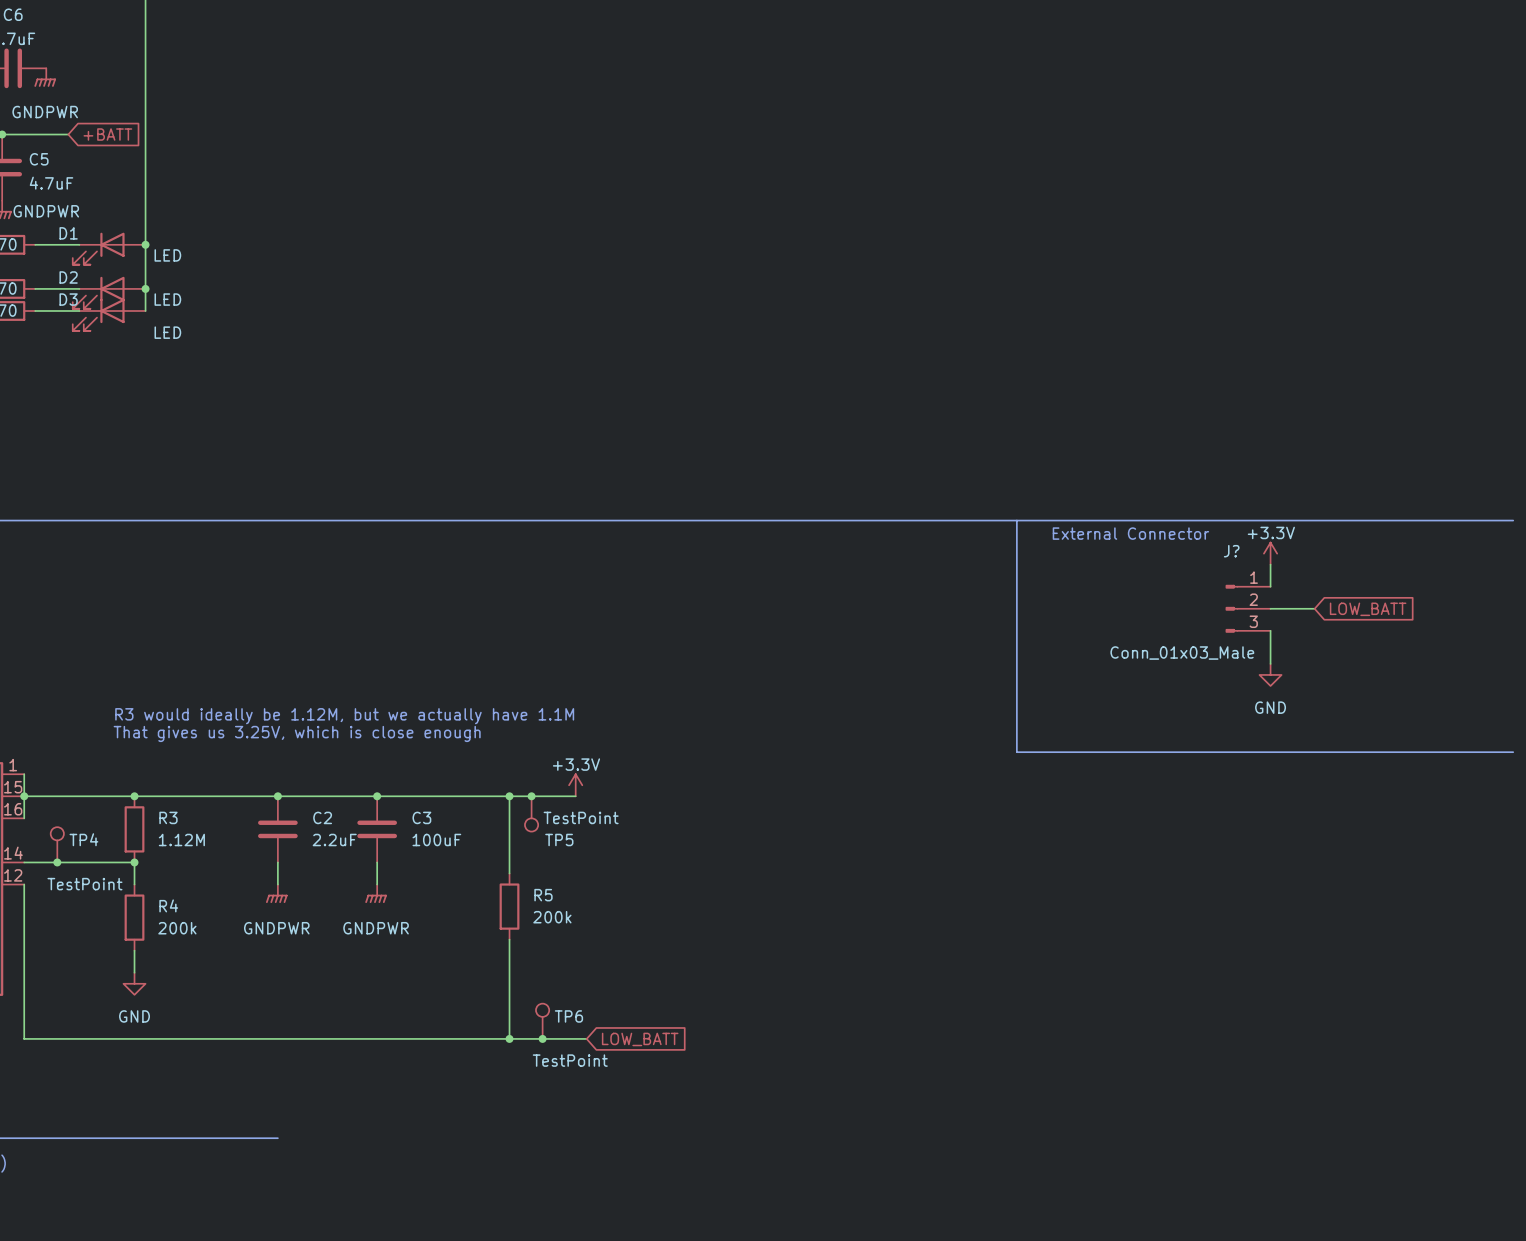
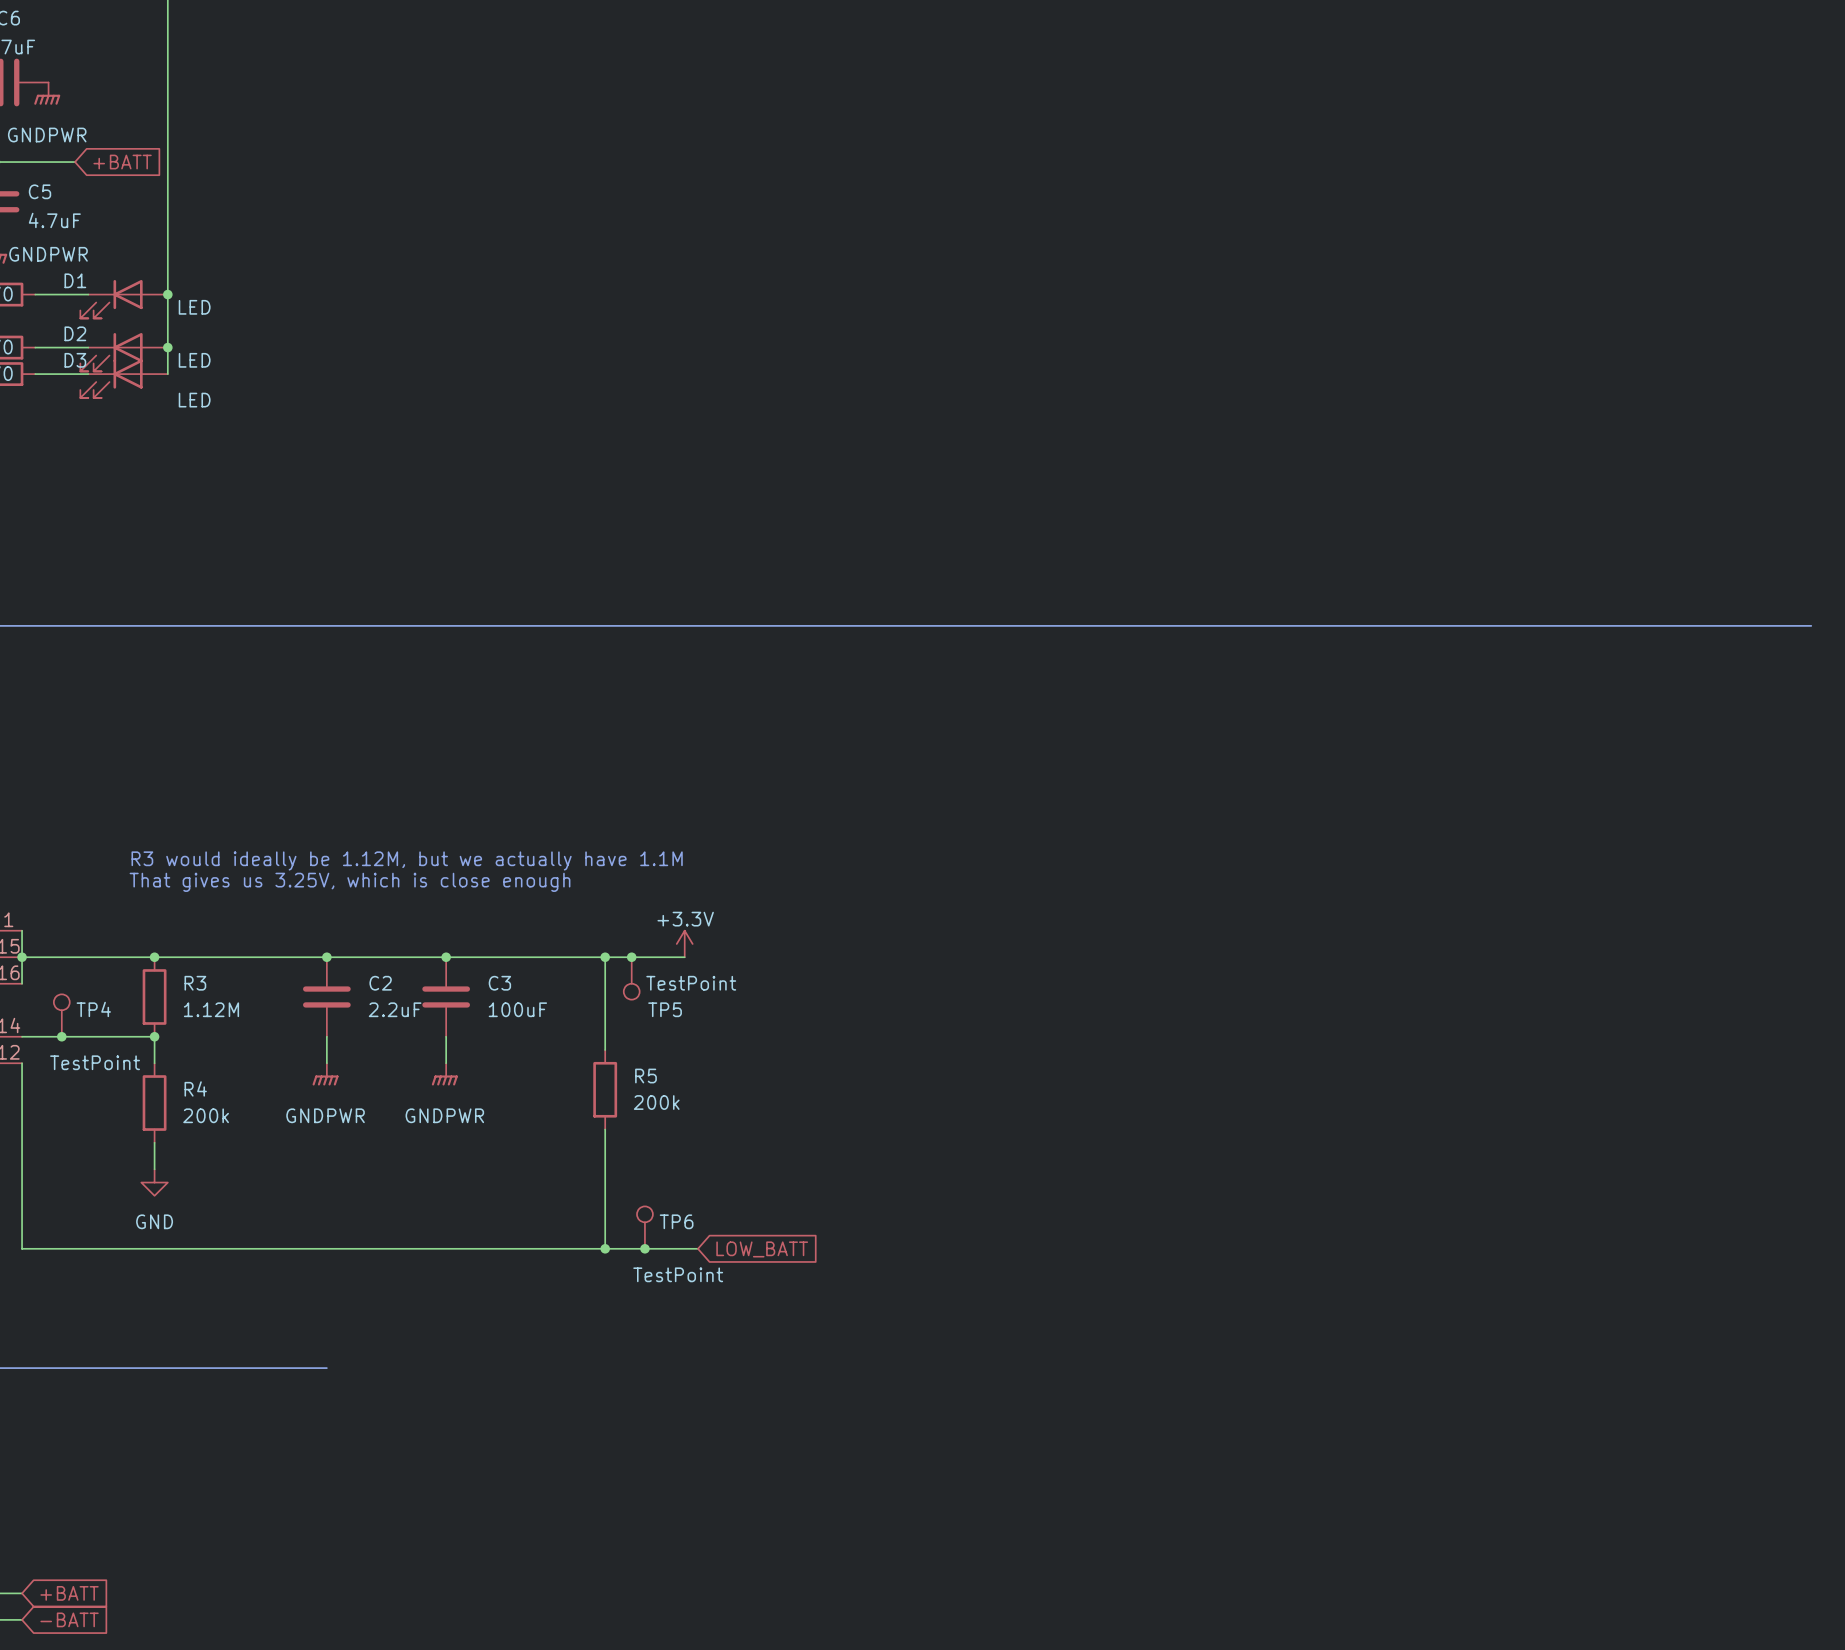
line: (1016, 520) (1016, 752) (1513, 752) -> none
text: External Connector (1130, 533) -> none
power symbol: +3.3V (1270, 553) -> none
wire: (1270, 564) (1270, 586) -> none
J?: Conn_01x03_Male (1248, 608) -> none
wire: (1270, 608) (1314, 608) -> none
global label: LOW_BATT (1368, 609) -> none
wire: (1270, 630) (1270, 663) -> none
power symbol: GND (1270, 674) -> none

